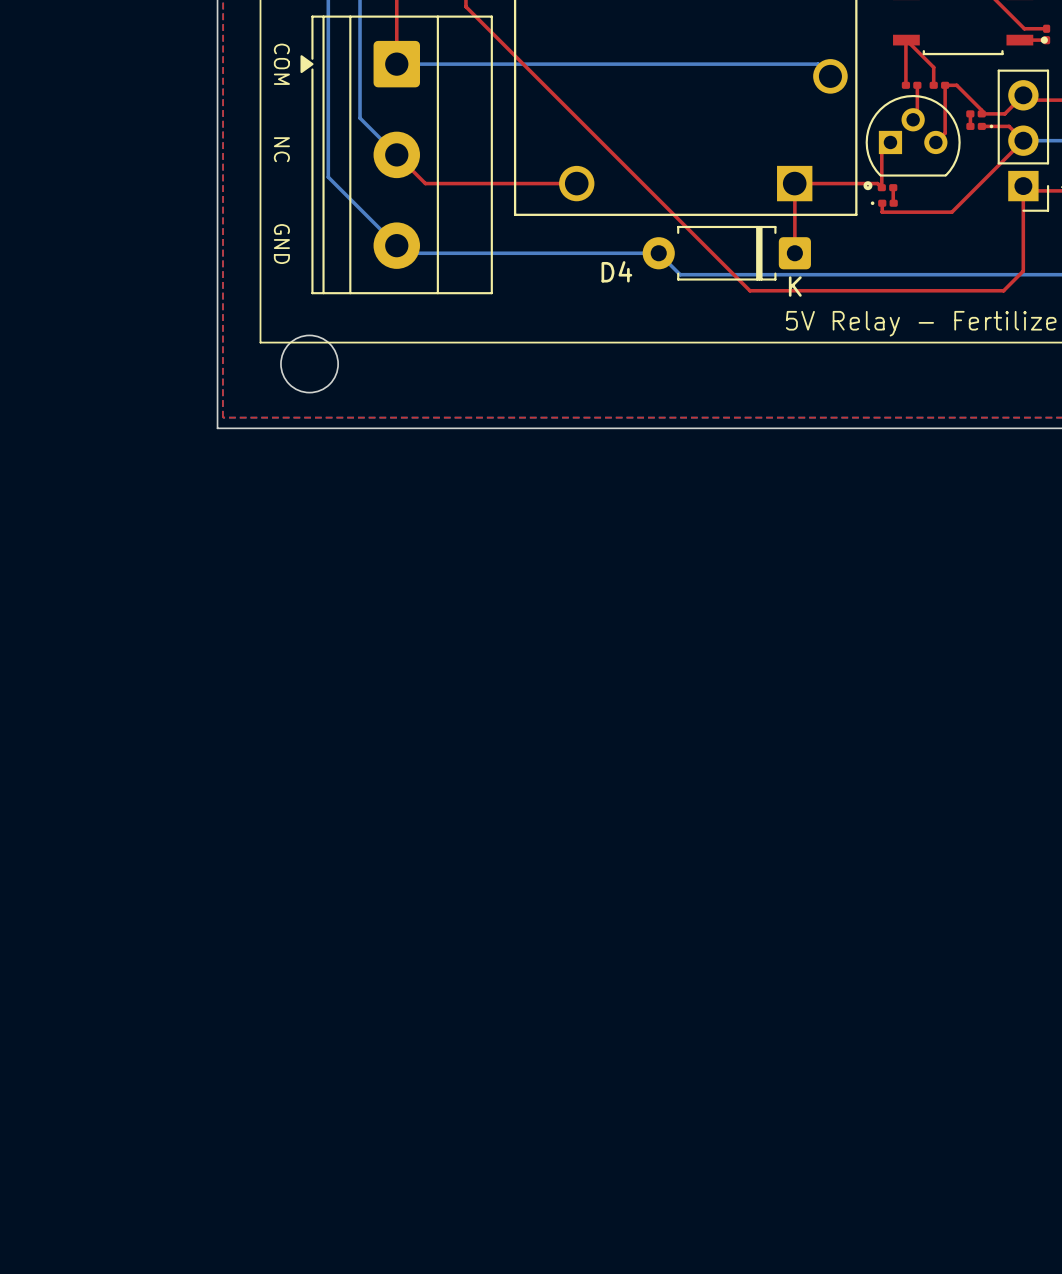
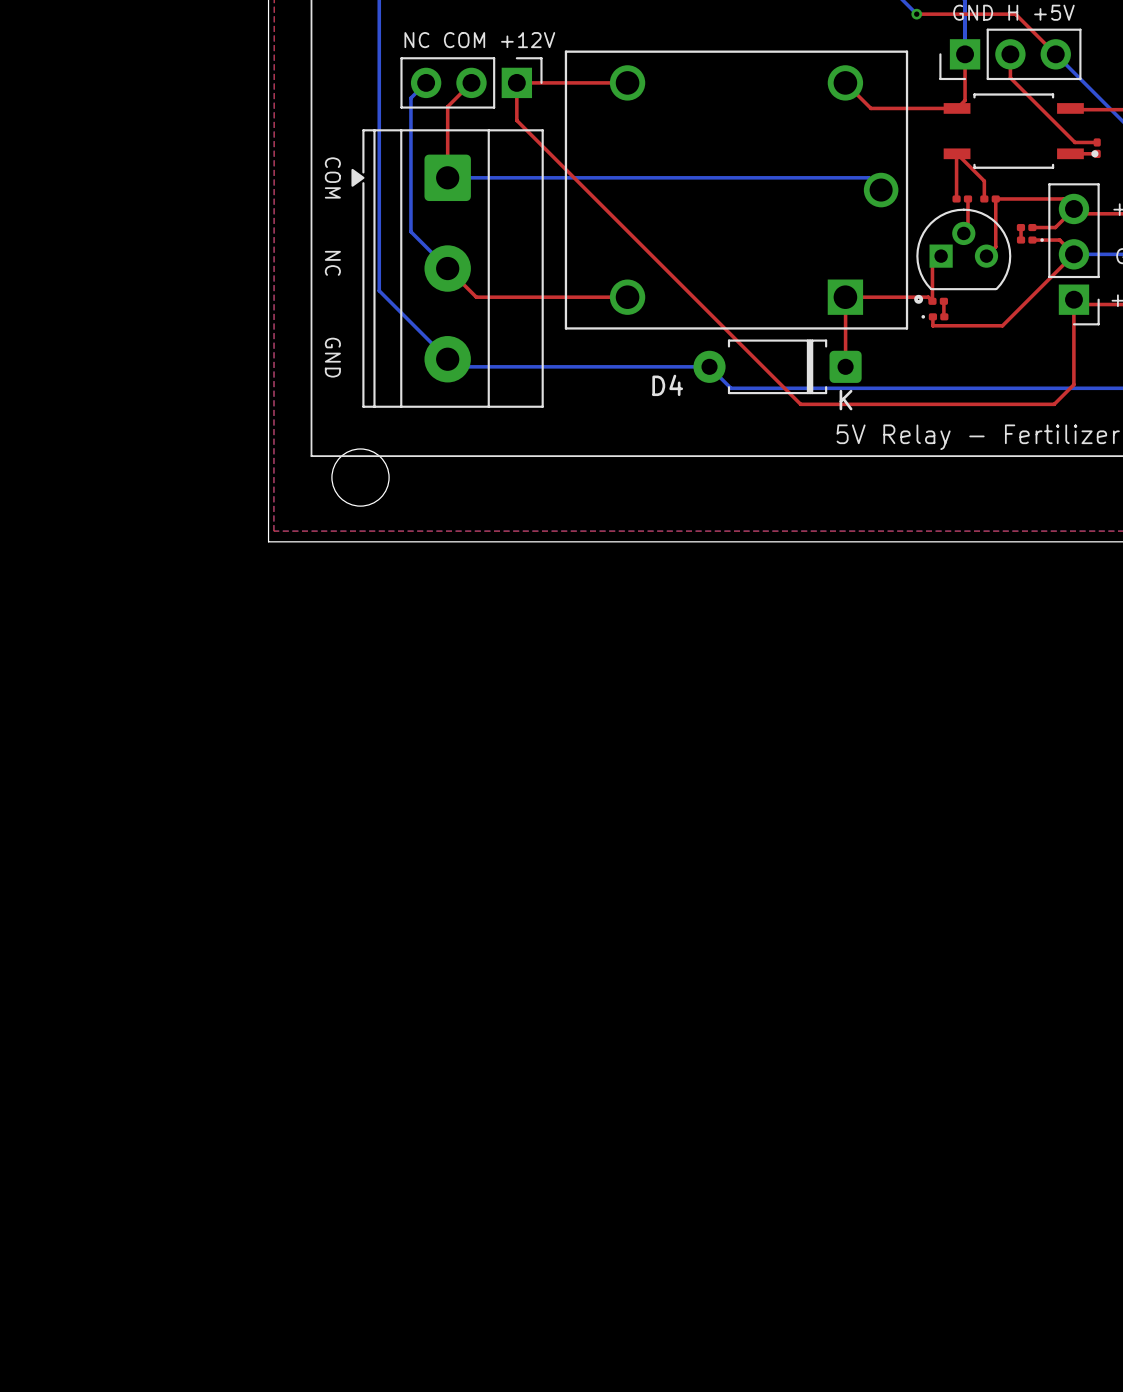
top track: (956, 85) (981, 110) (981, 113) -> (1007, 198) (1063, 198) (1073, 208)

